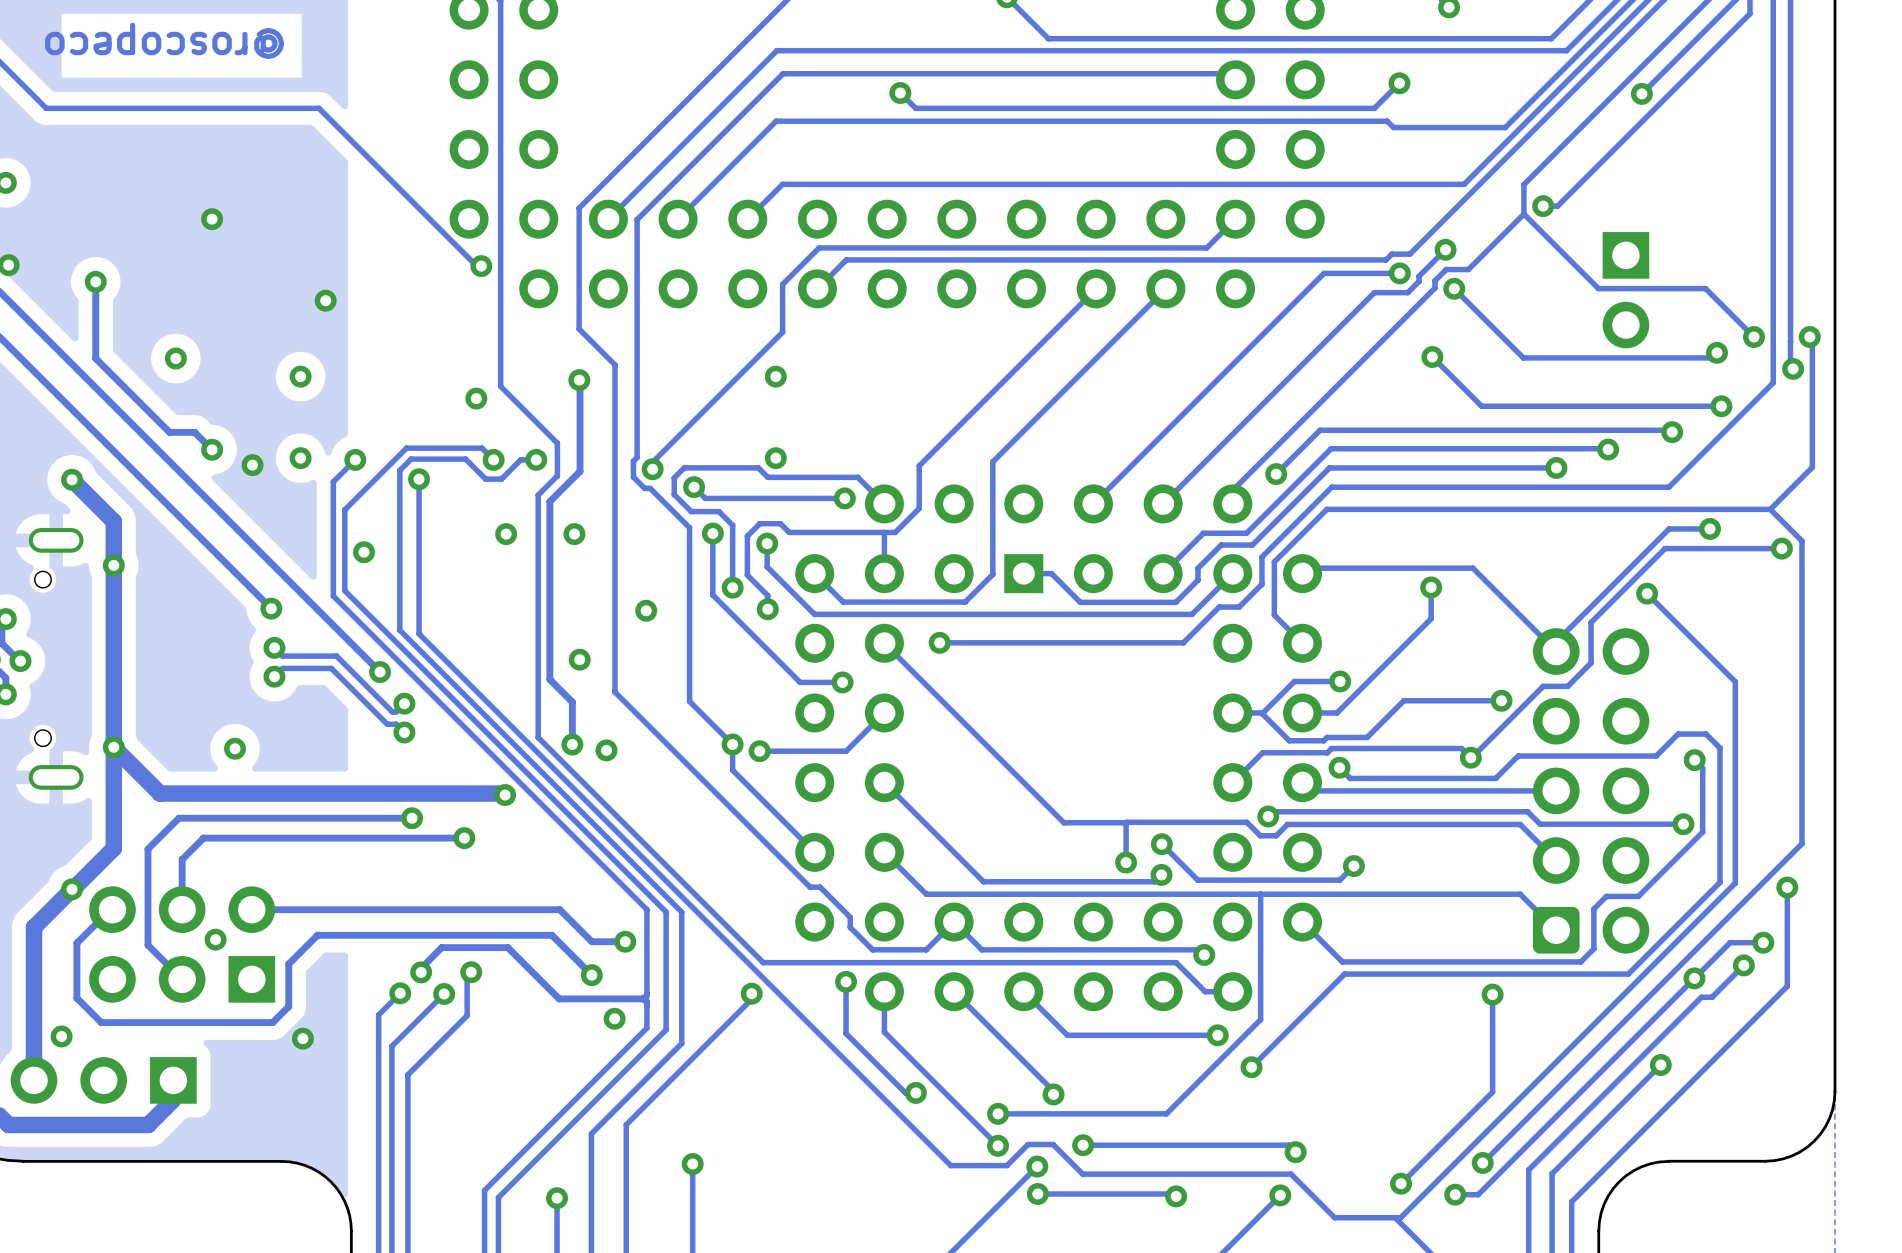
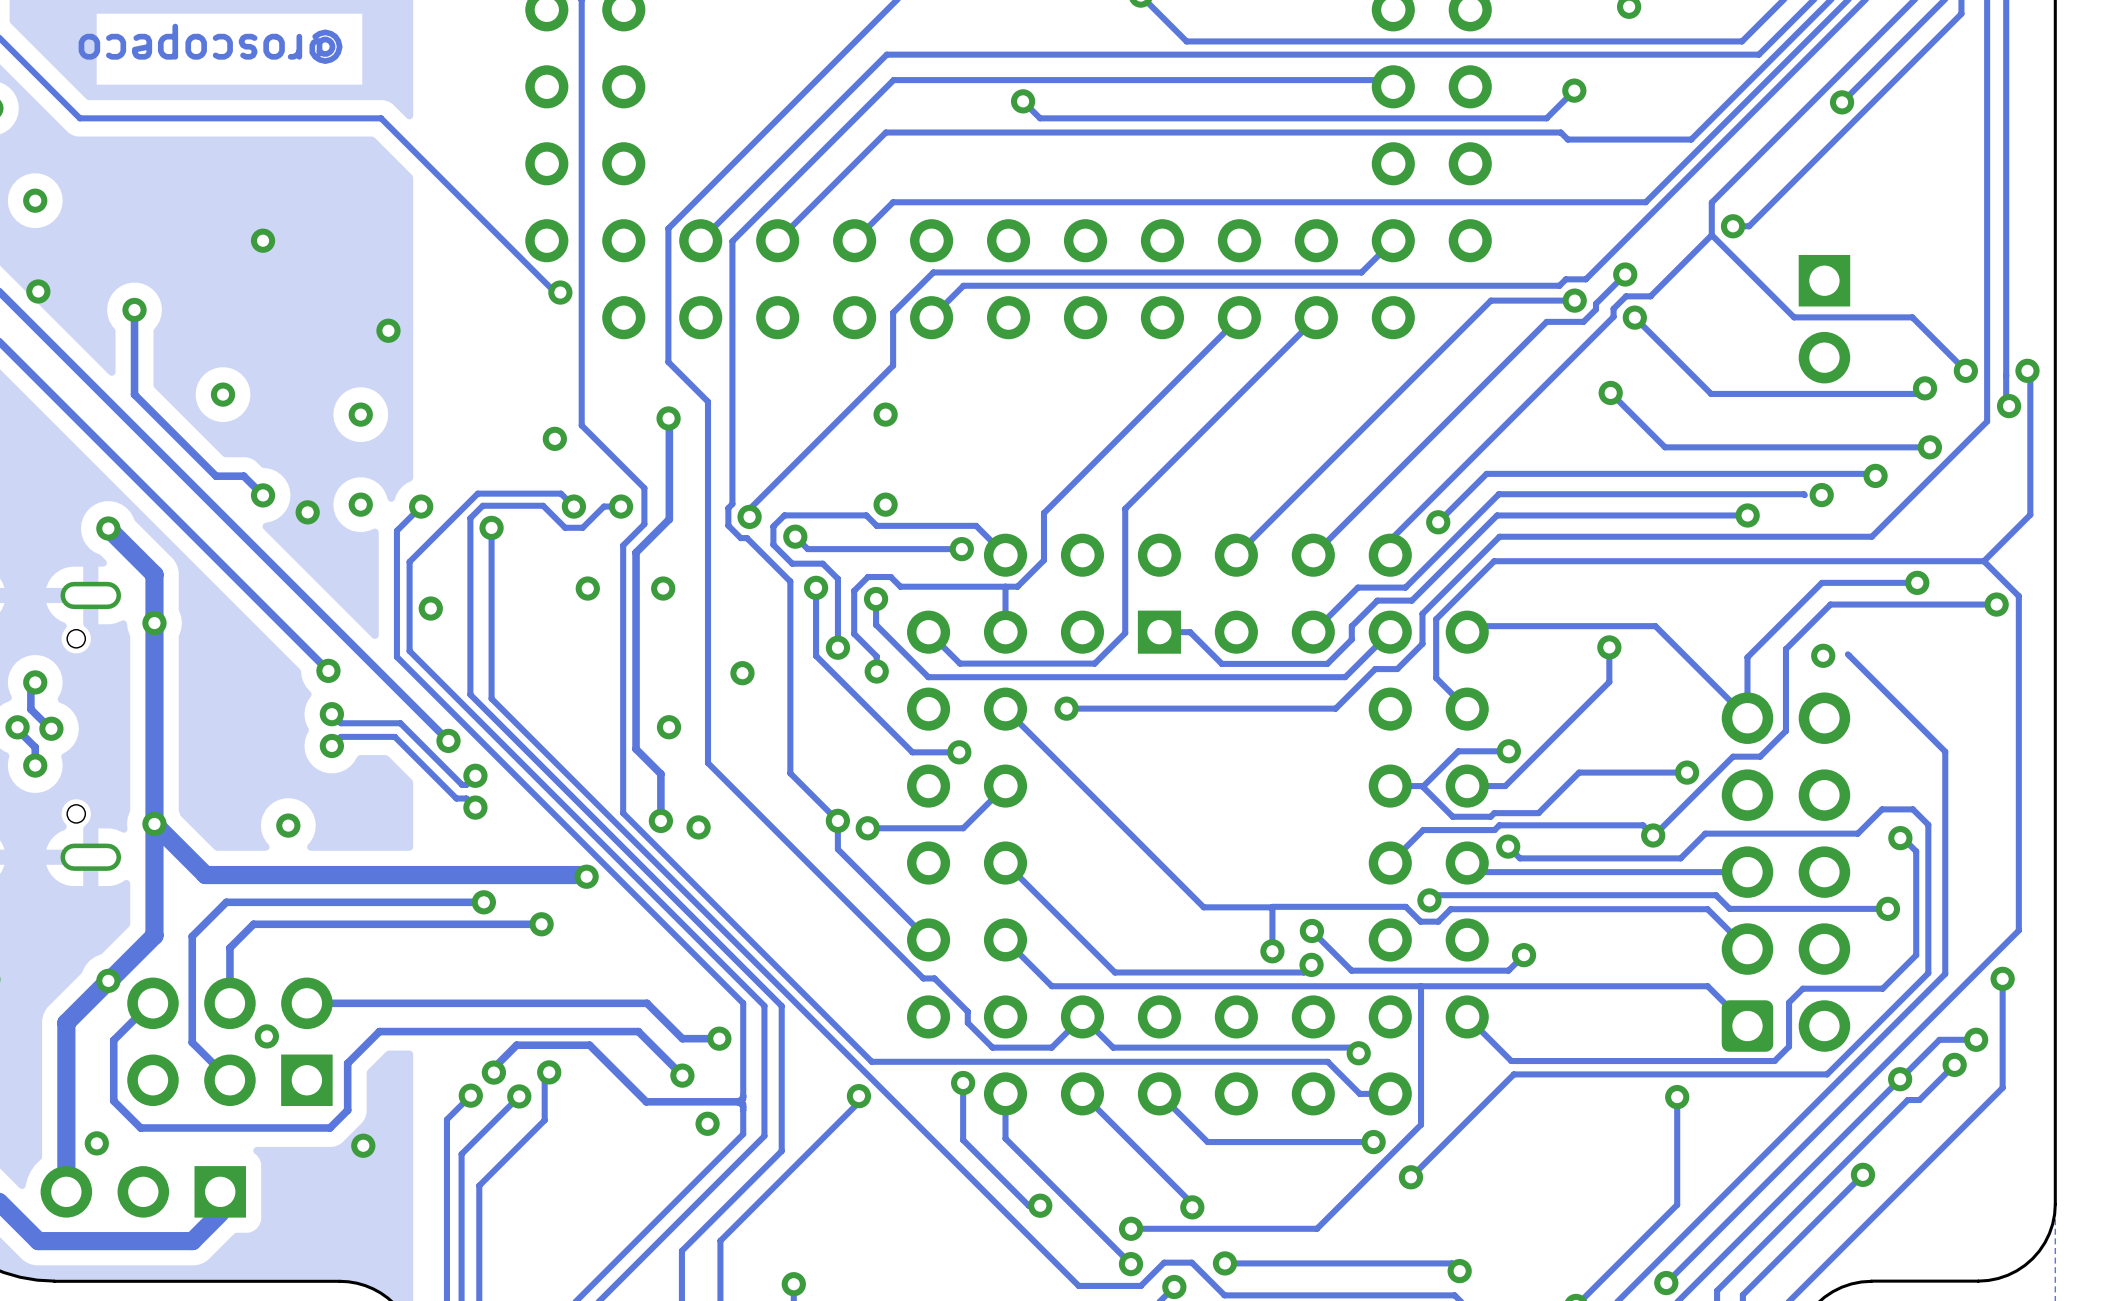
via position: (1608, 449) -> (1821, 495)
track: (1669, 528) (1556, 641) -> (1872, 582) (1821, 582) (1747, 657) (1747, 707)
track: (1665, 548) (1591, 622) -> (1867, 604) (1830, 604) (1785, 649) (1785, 686)
via position: (1647, 593) -> (1823, 655)
track: (1694, 760) (1702, 768) (1702, 832) (1638, 896) -> (1900, 836) (1916, 851) (1916, 955) (1882, 988) (1838, 988)

